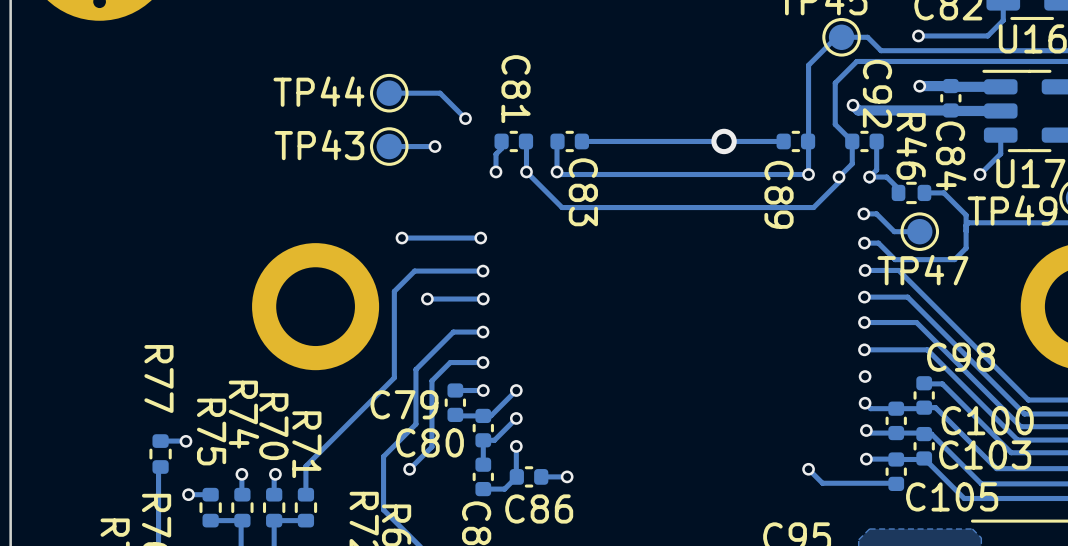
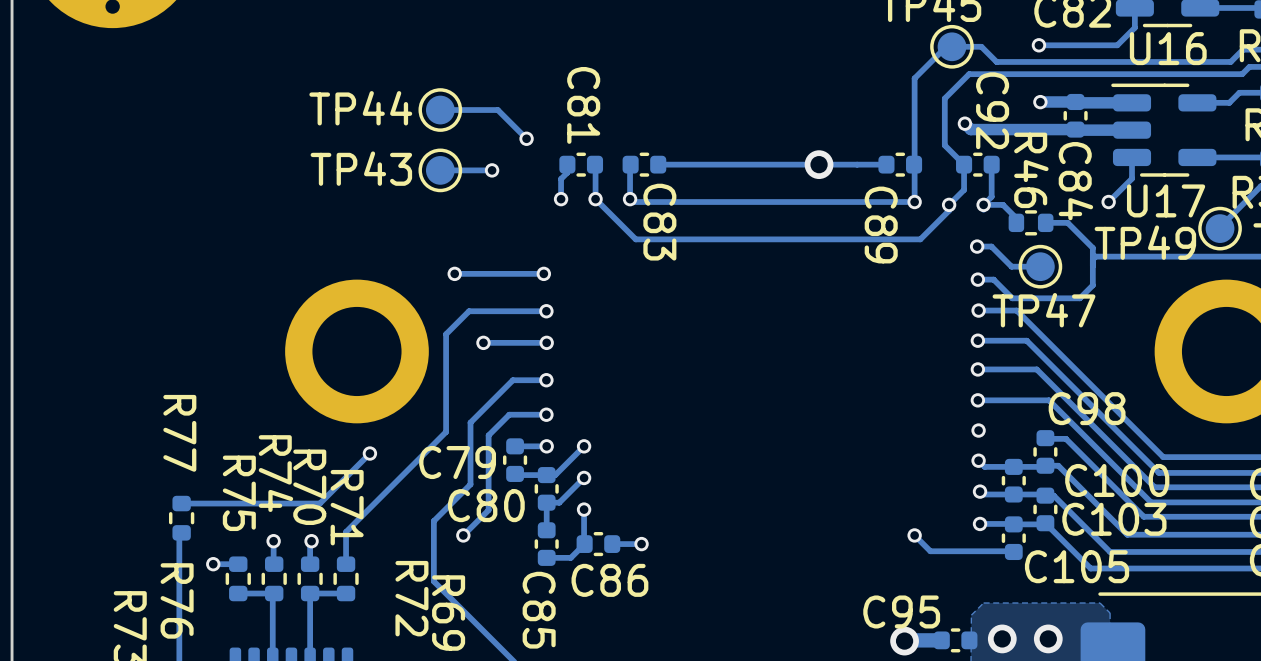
track: none -> (369, 453) (319, 503) (210, 503)
via position: (185, 441) -> (369, 453)

